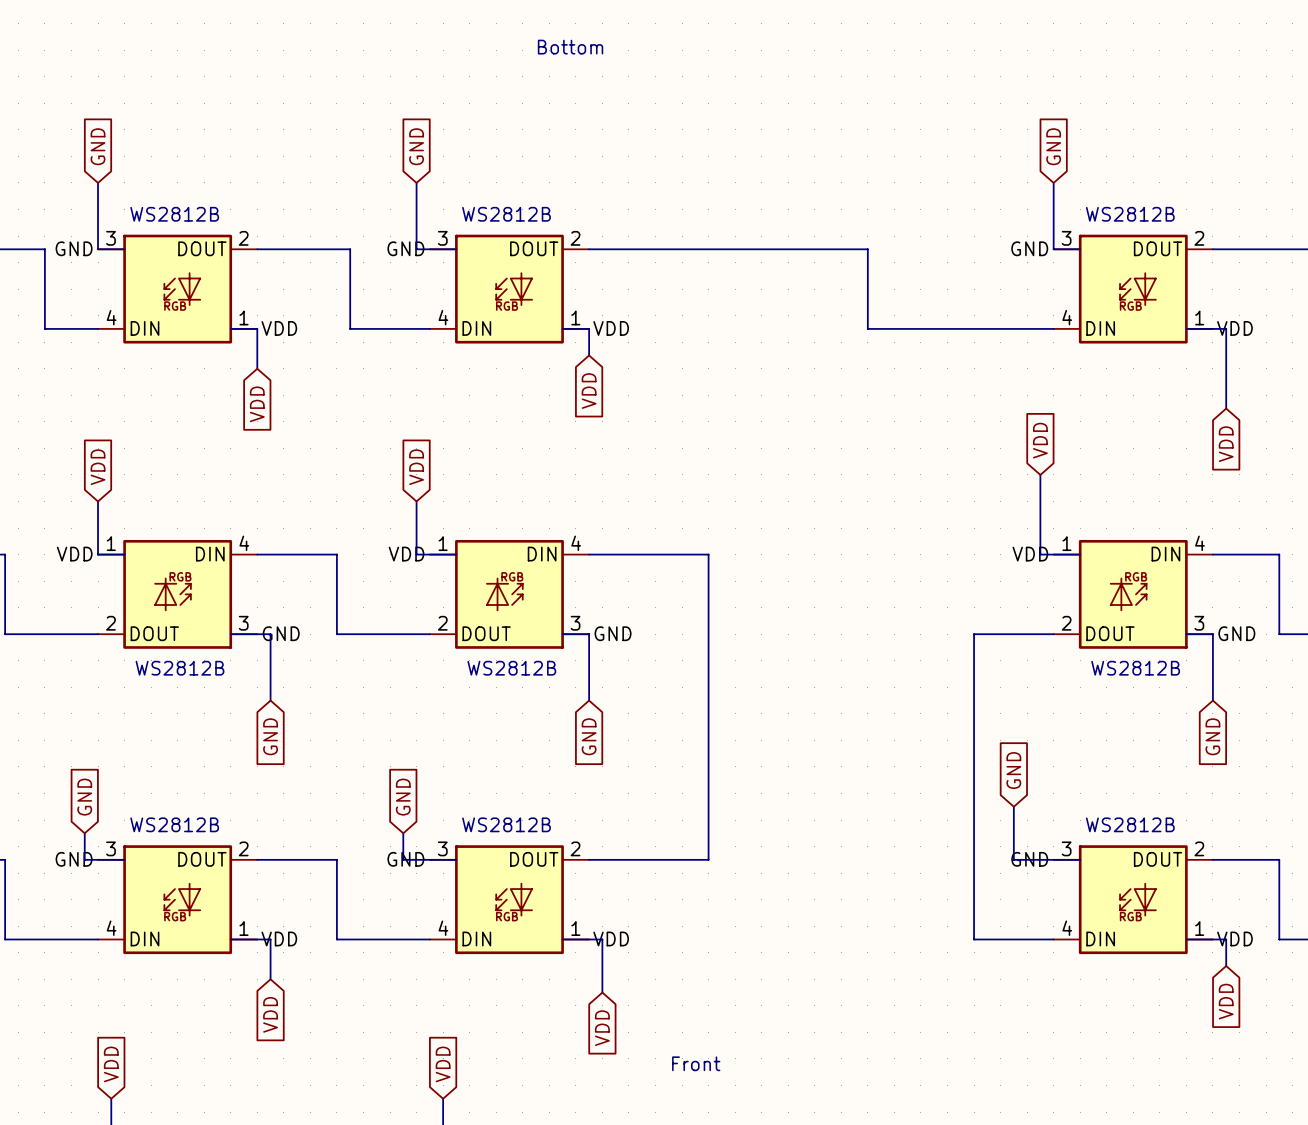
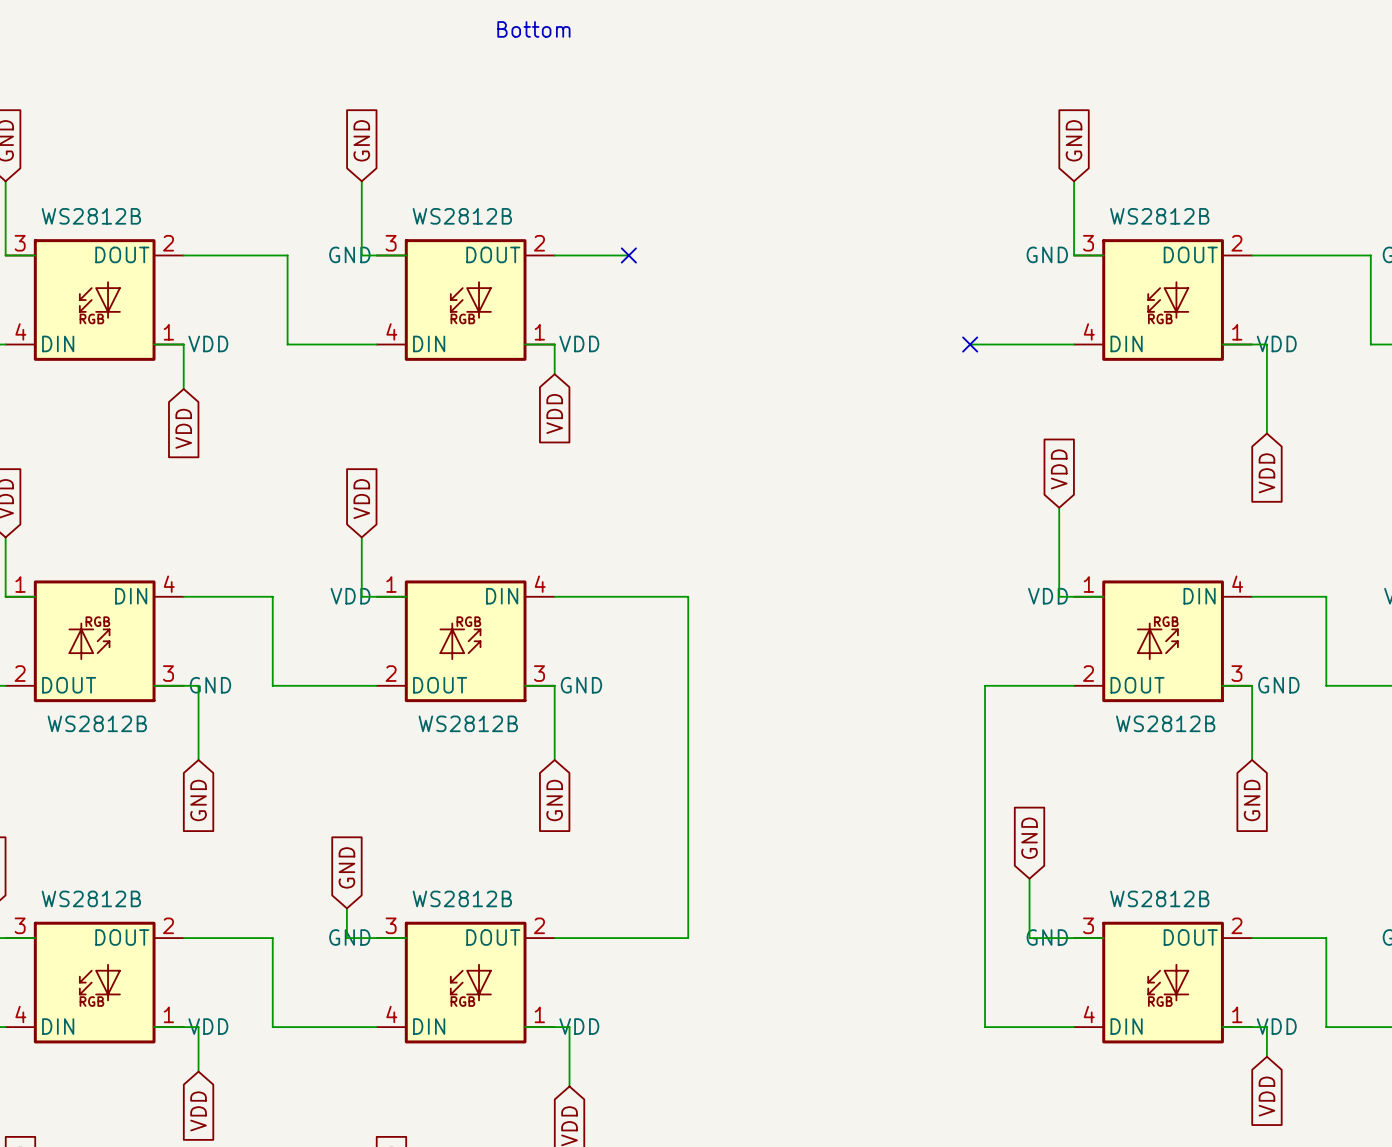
wire: (655, 249) (867, 249) (867, 328) (960, 328) -> none
no-connect mark: none -> (628, 255)
no-connect mark: none -> (970, 344)

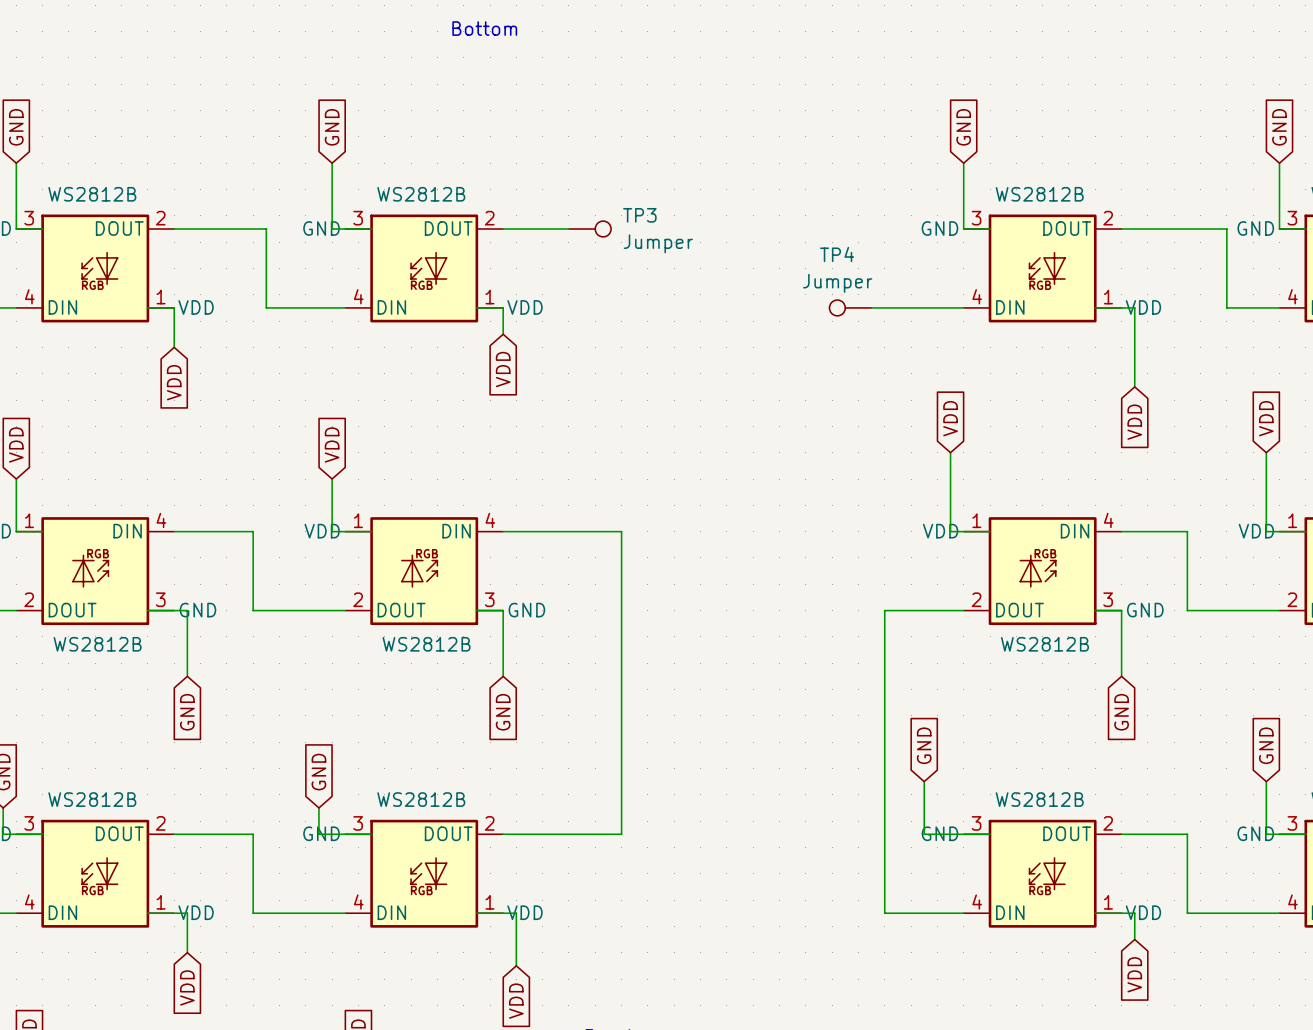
no-connect mark: (628, 255) -> none
TP3: none -> Jumper (590, 229)
TP4: none -> Jumper (850, 307)
no-connect mark: (970, 344) -> none

